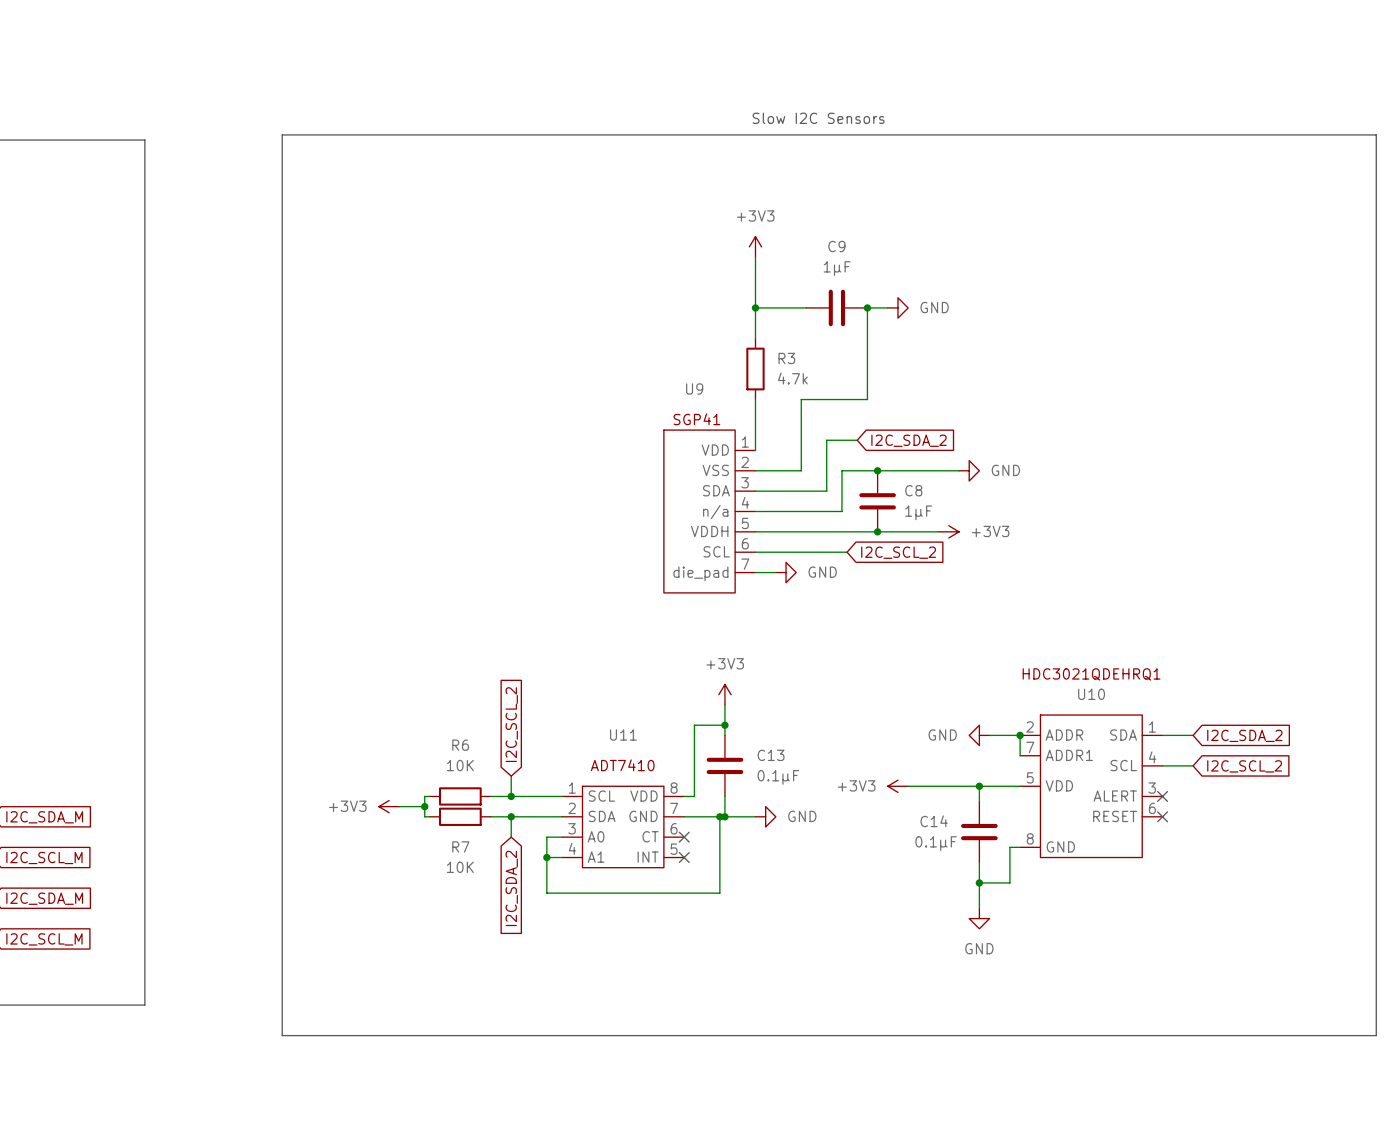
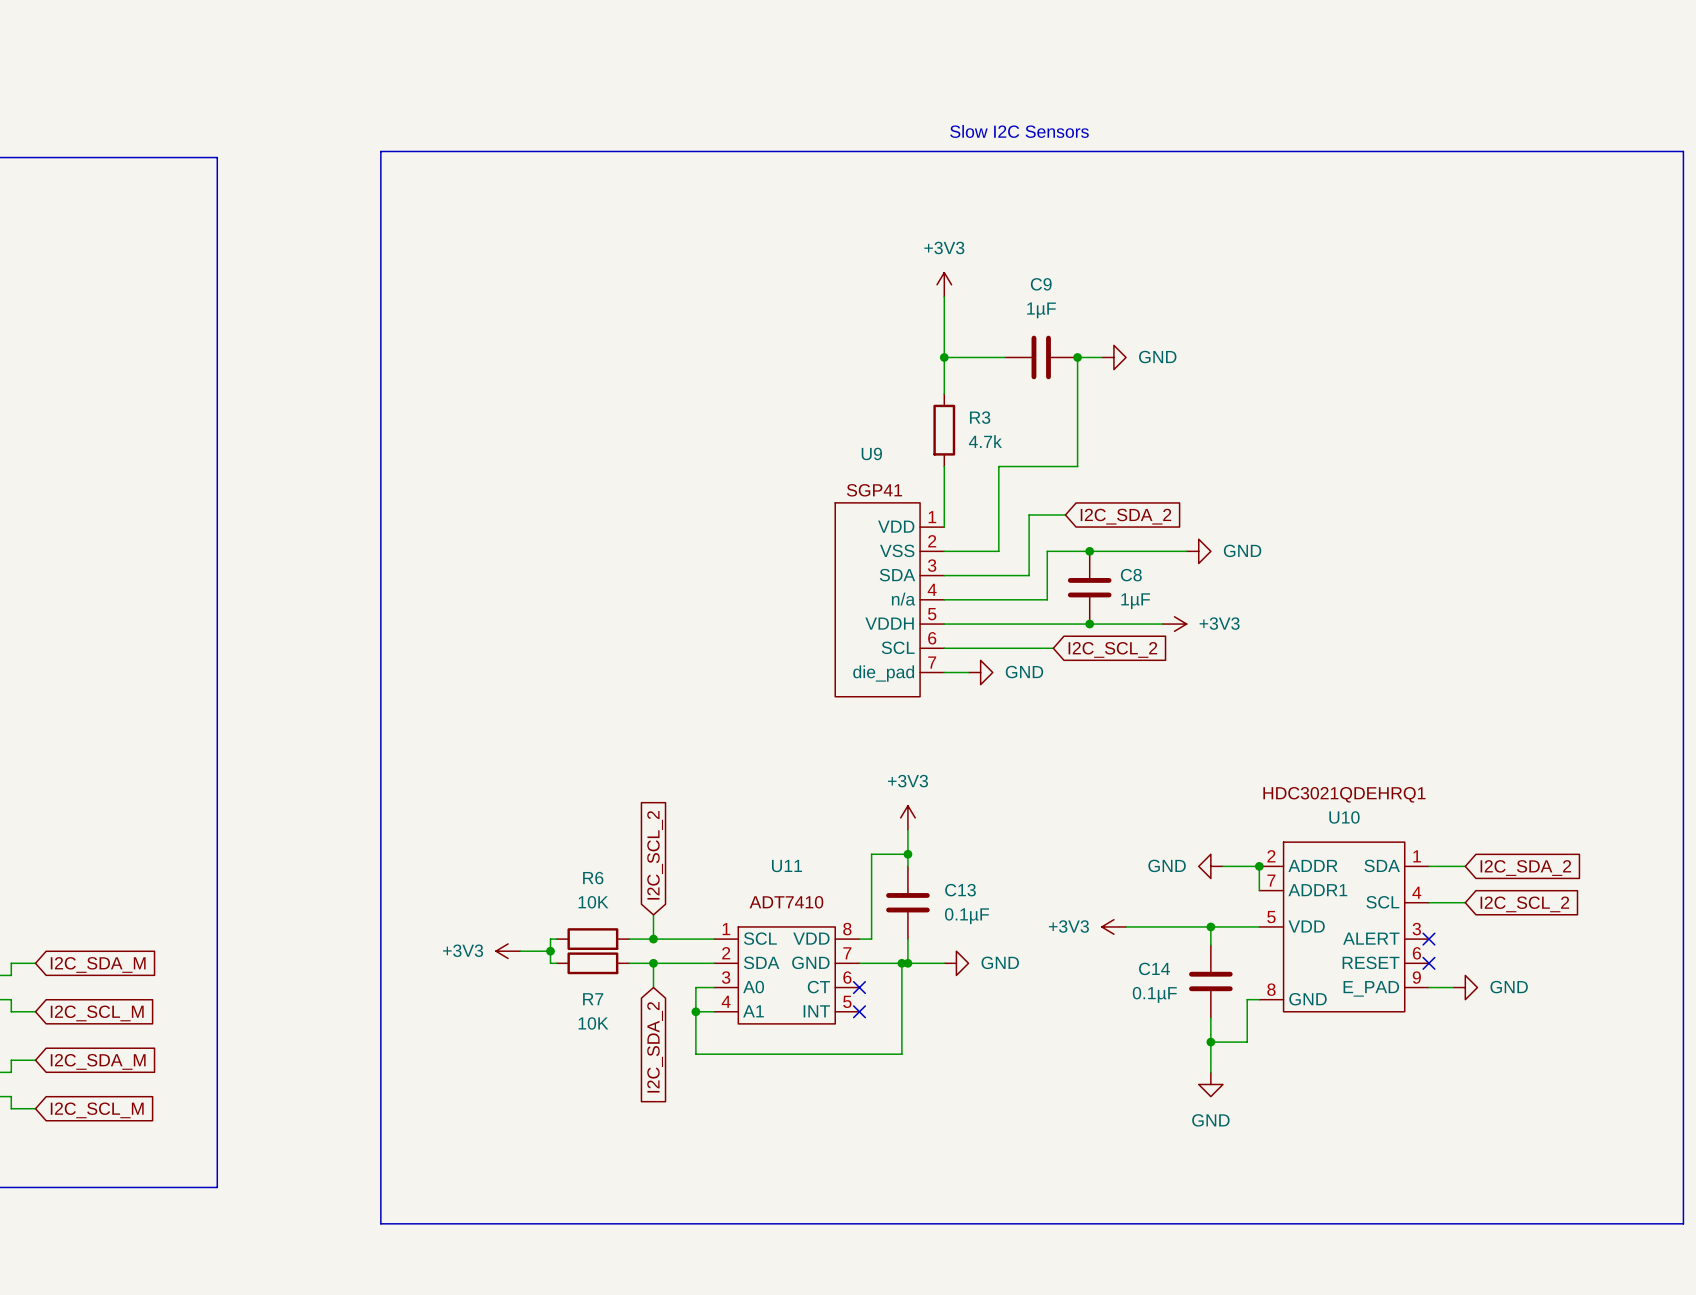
U10 symbol: [1020, 715, 1163, 858] -> [1259, 842, 1429, 1012]
wire: none -> (1428, 987) (1453, 987)
power symbol: none -> GND (1465, 987)

